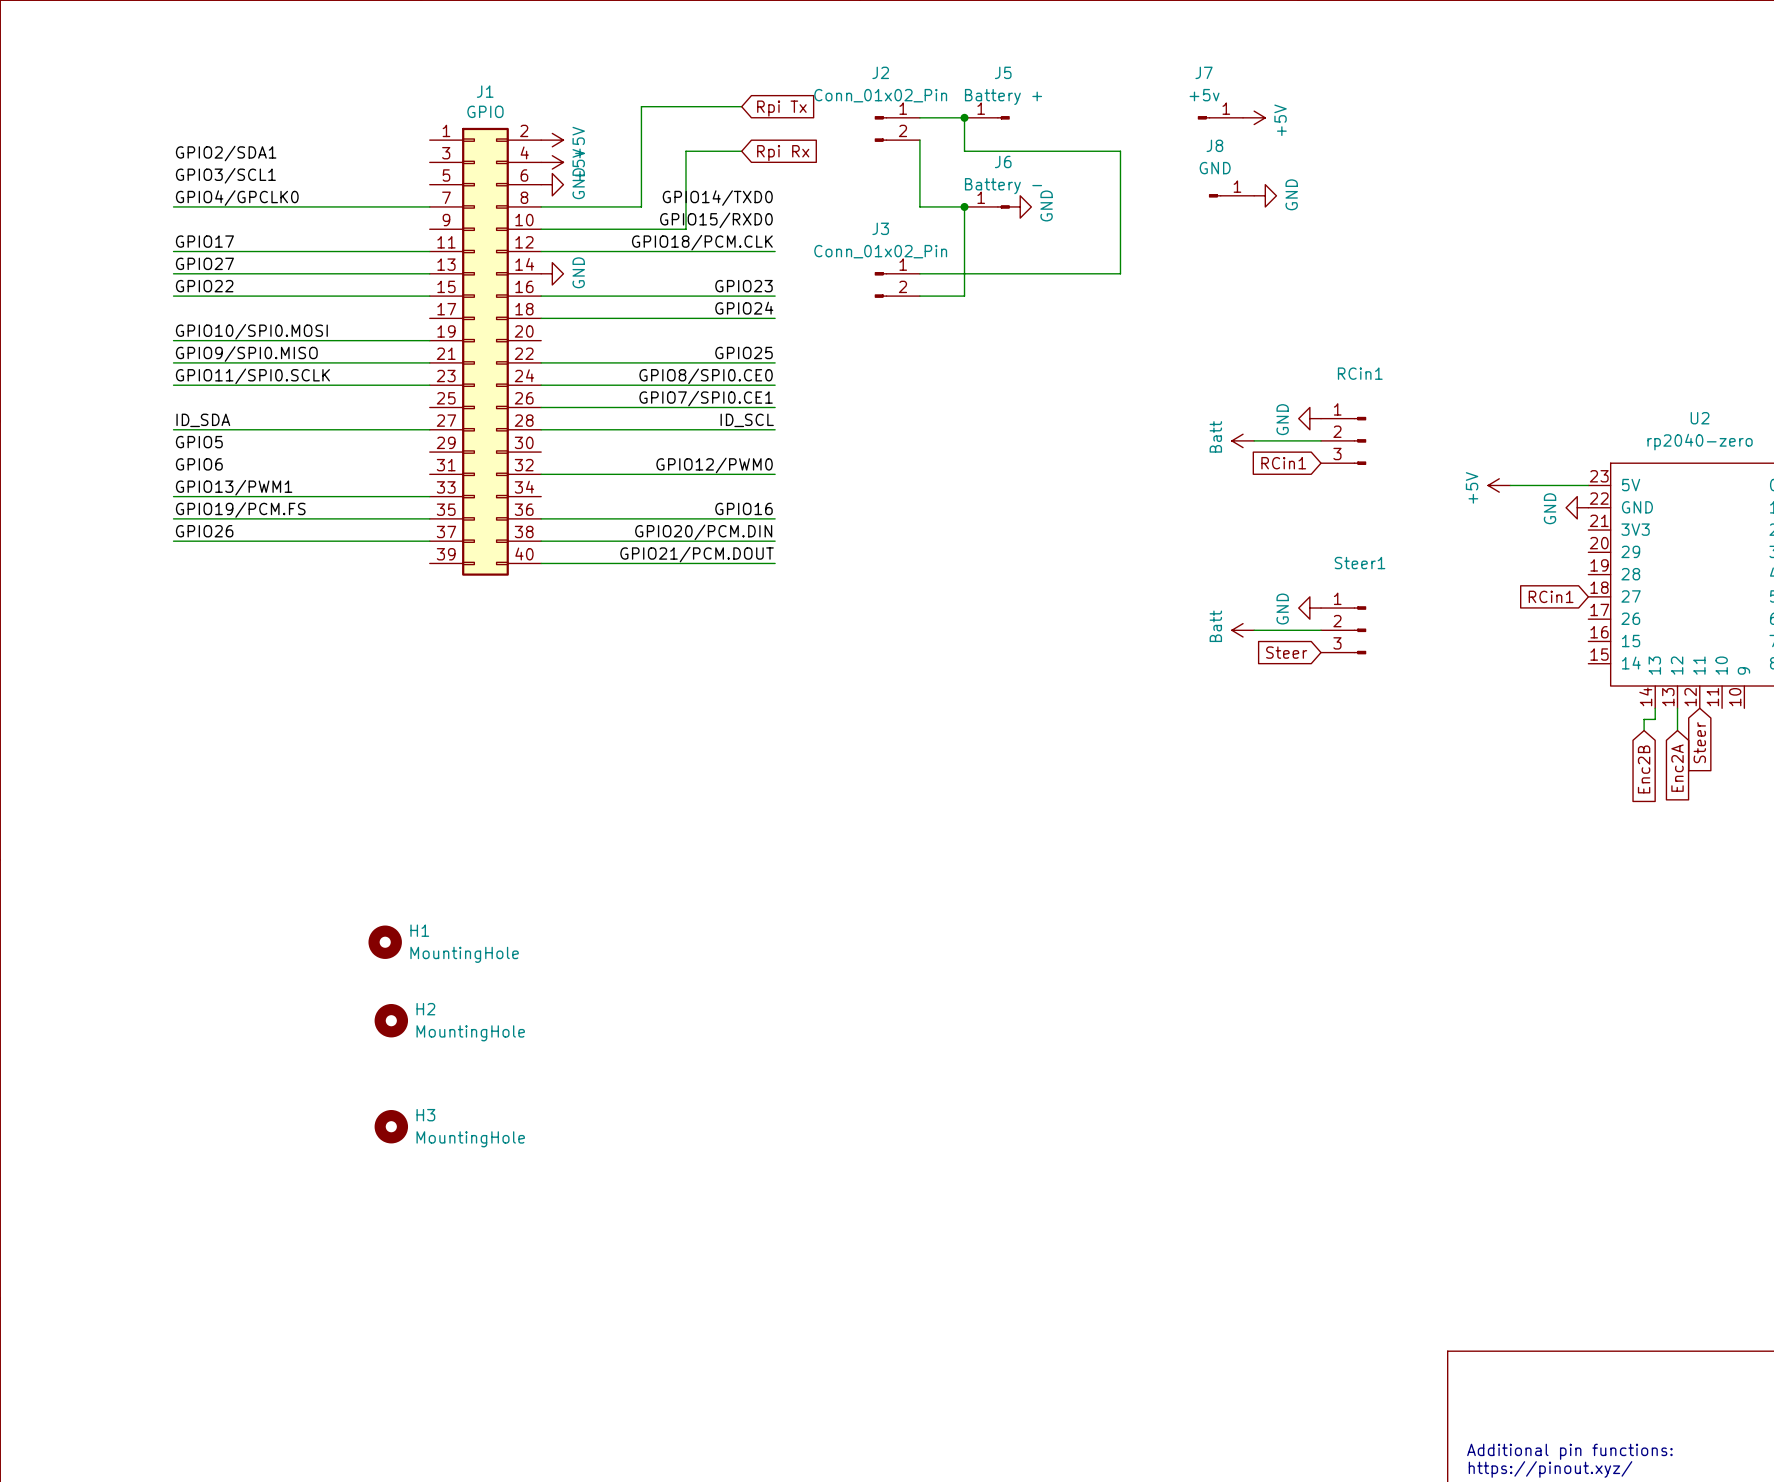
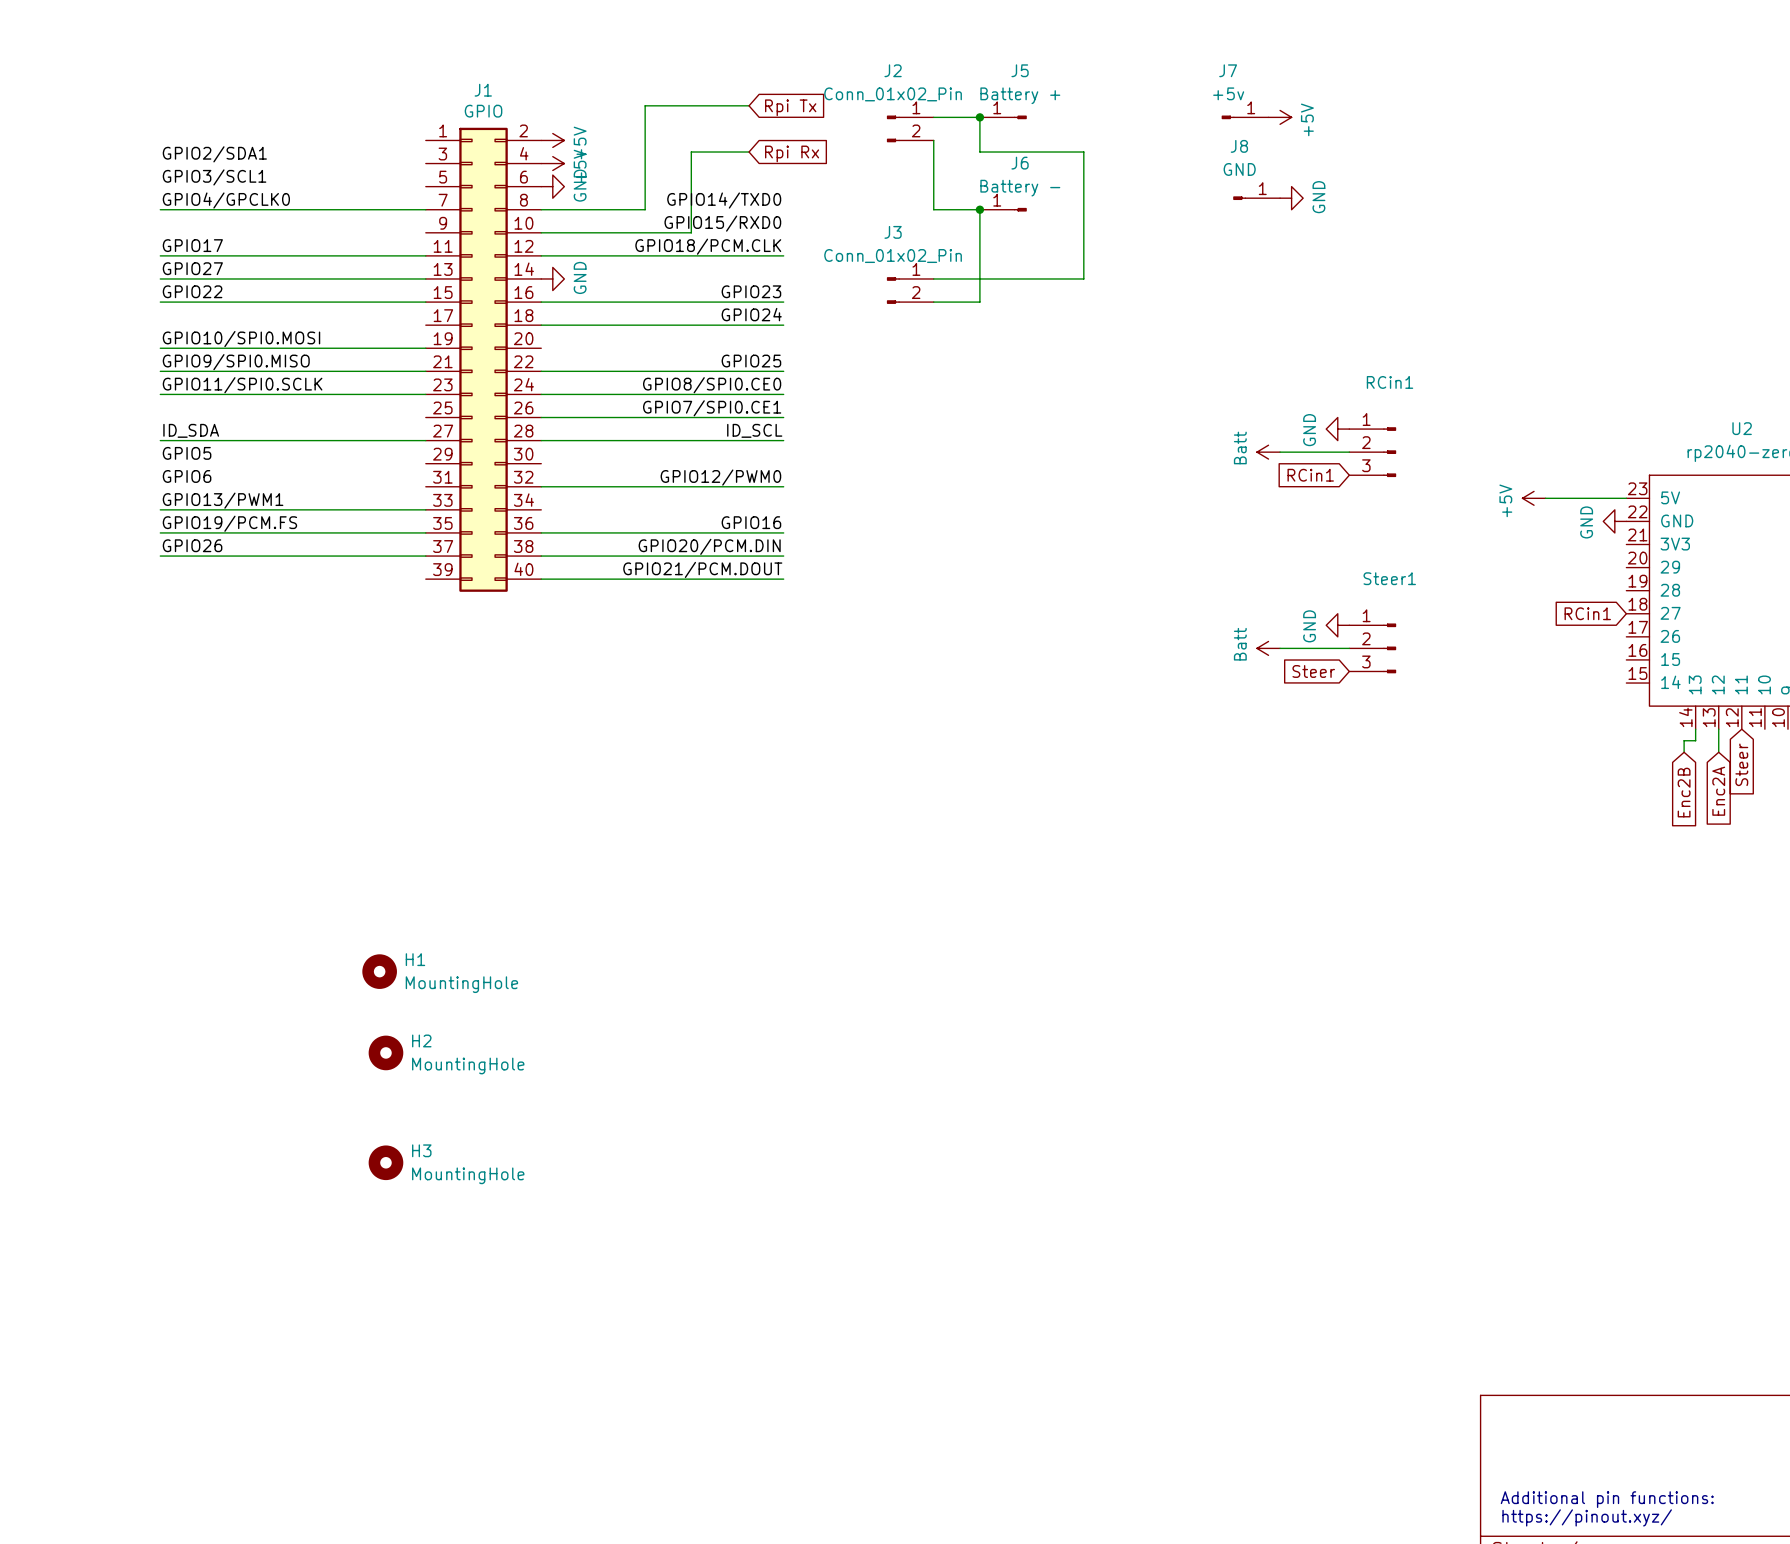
wire: (1064, 151) (1120, 151) (1120, 273) (1064, 273) -> (1083, 152) (1083, 278)
power symbol: GND (1020, 206) -> none

